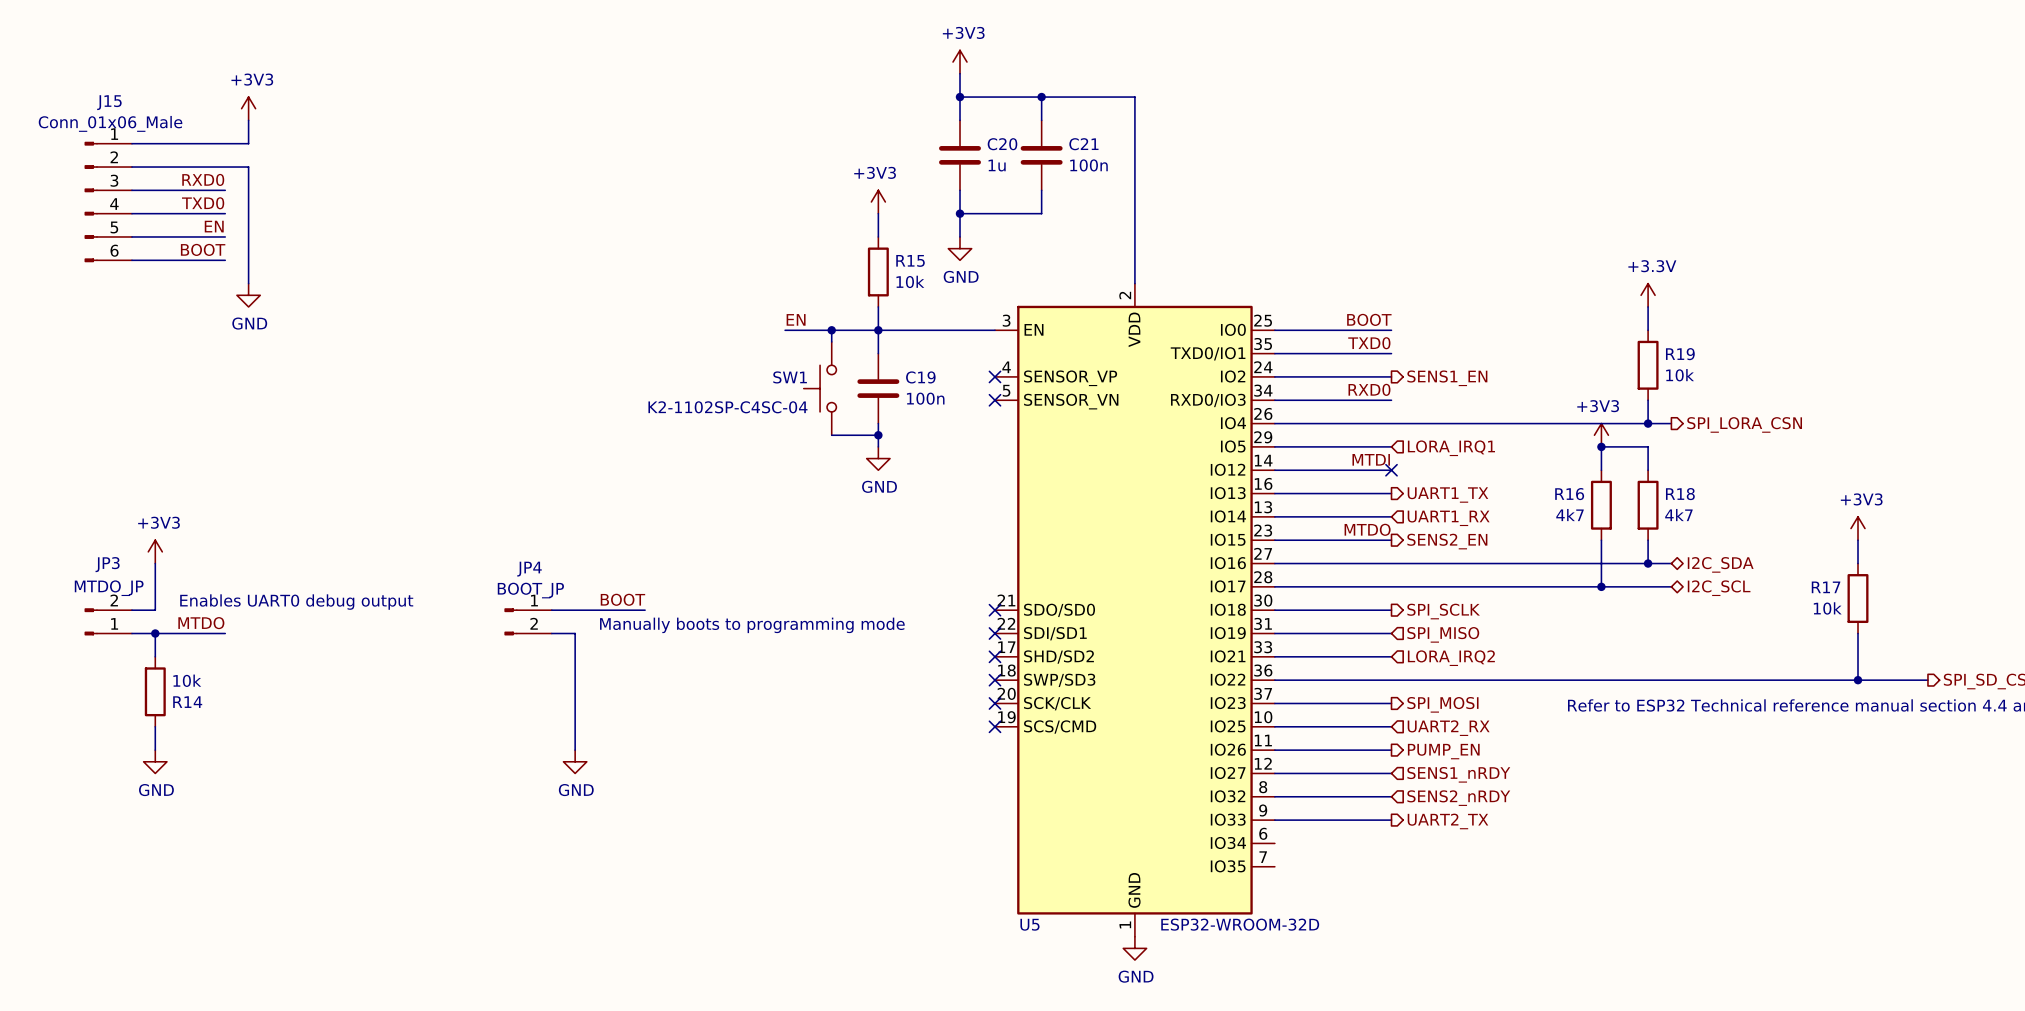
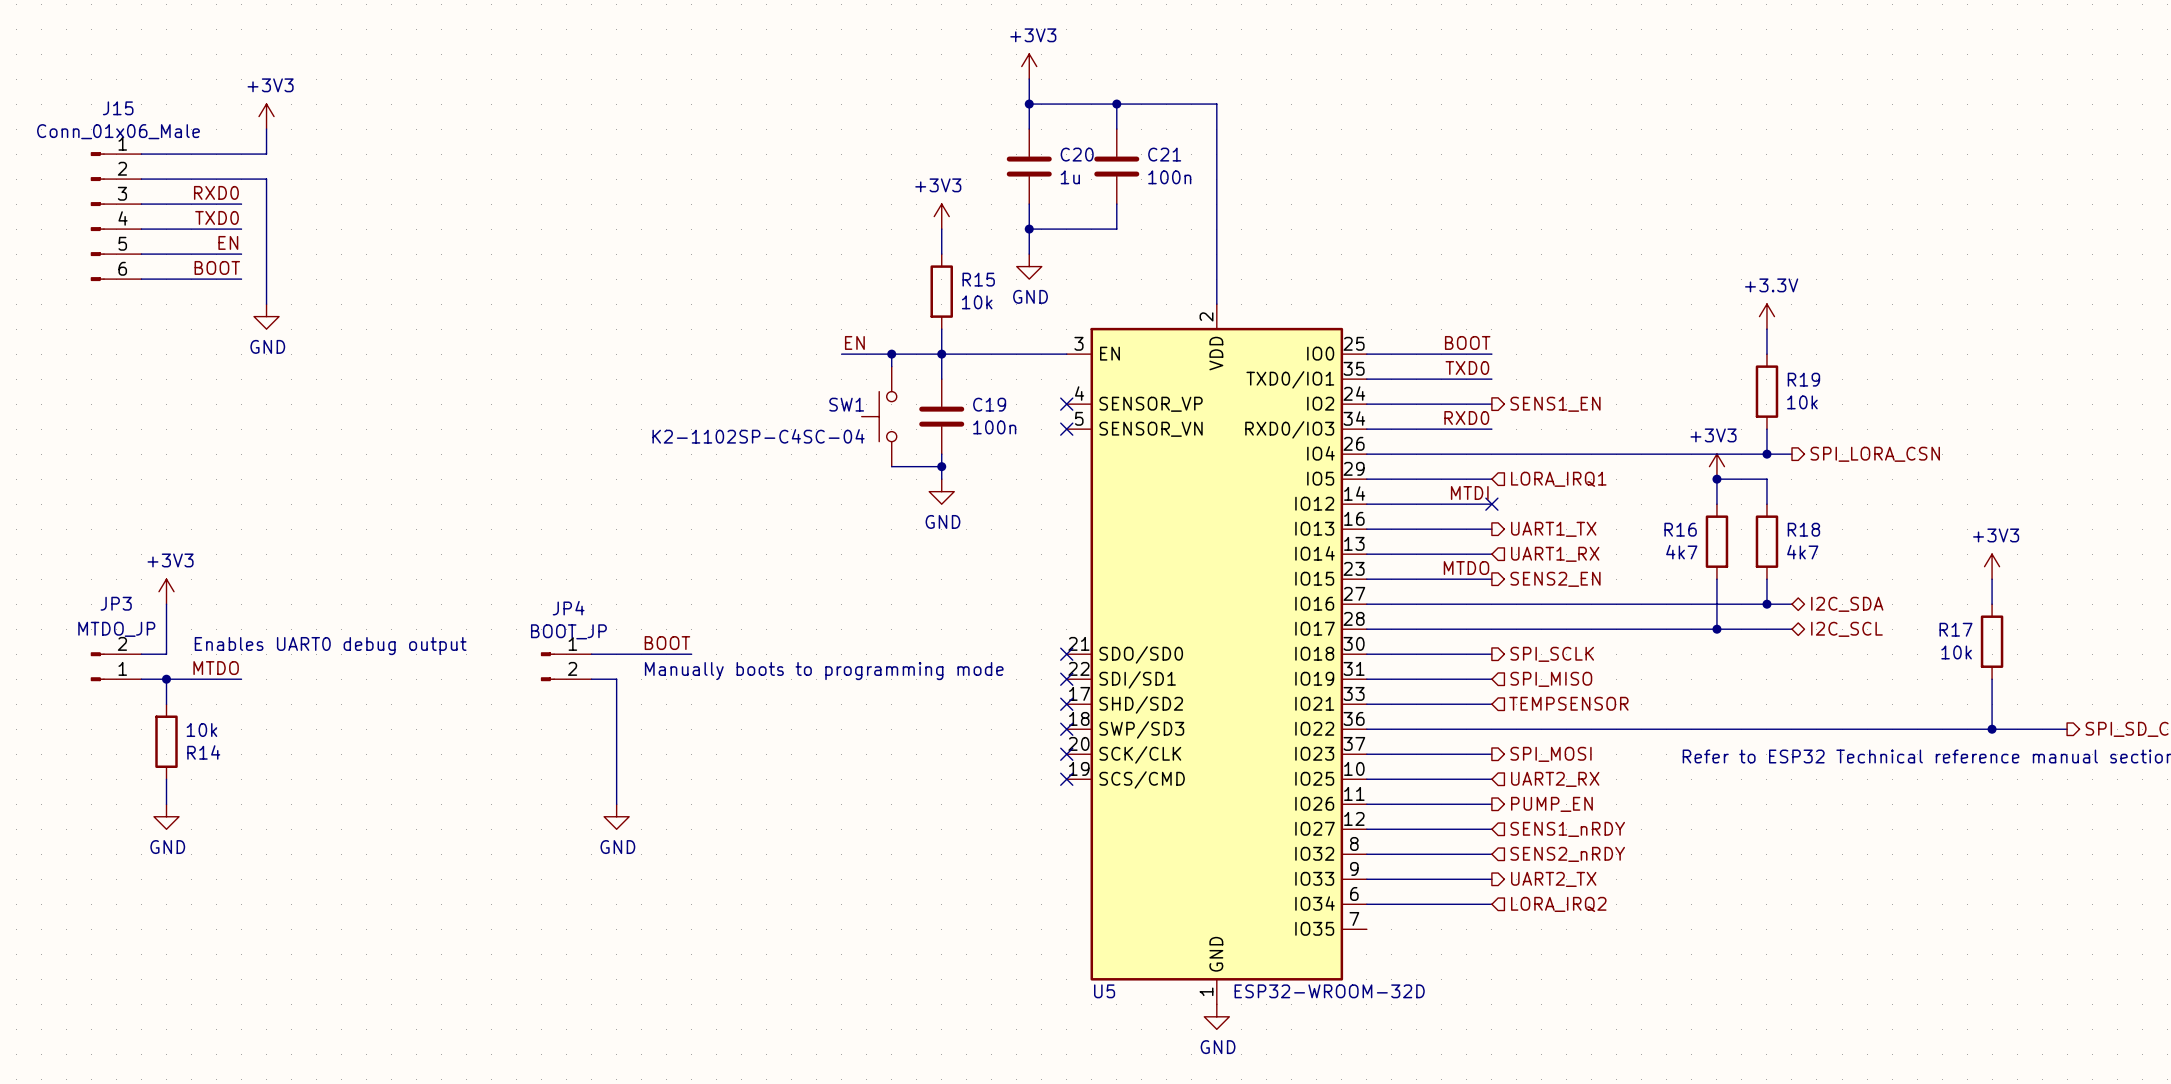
hierarchical label: LORA_IRQ2 (1451, 658) -> TEMPSENSOR (1568, 703)
wire: none -> (1366, 904) (1491, 904)
hierarchical label: none -> LORA_IRQ2 (1558, 904)

